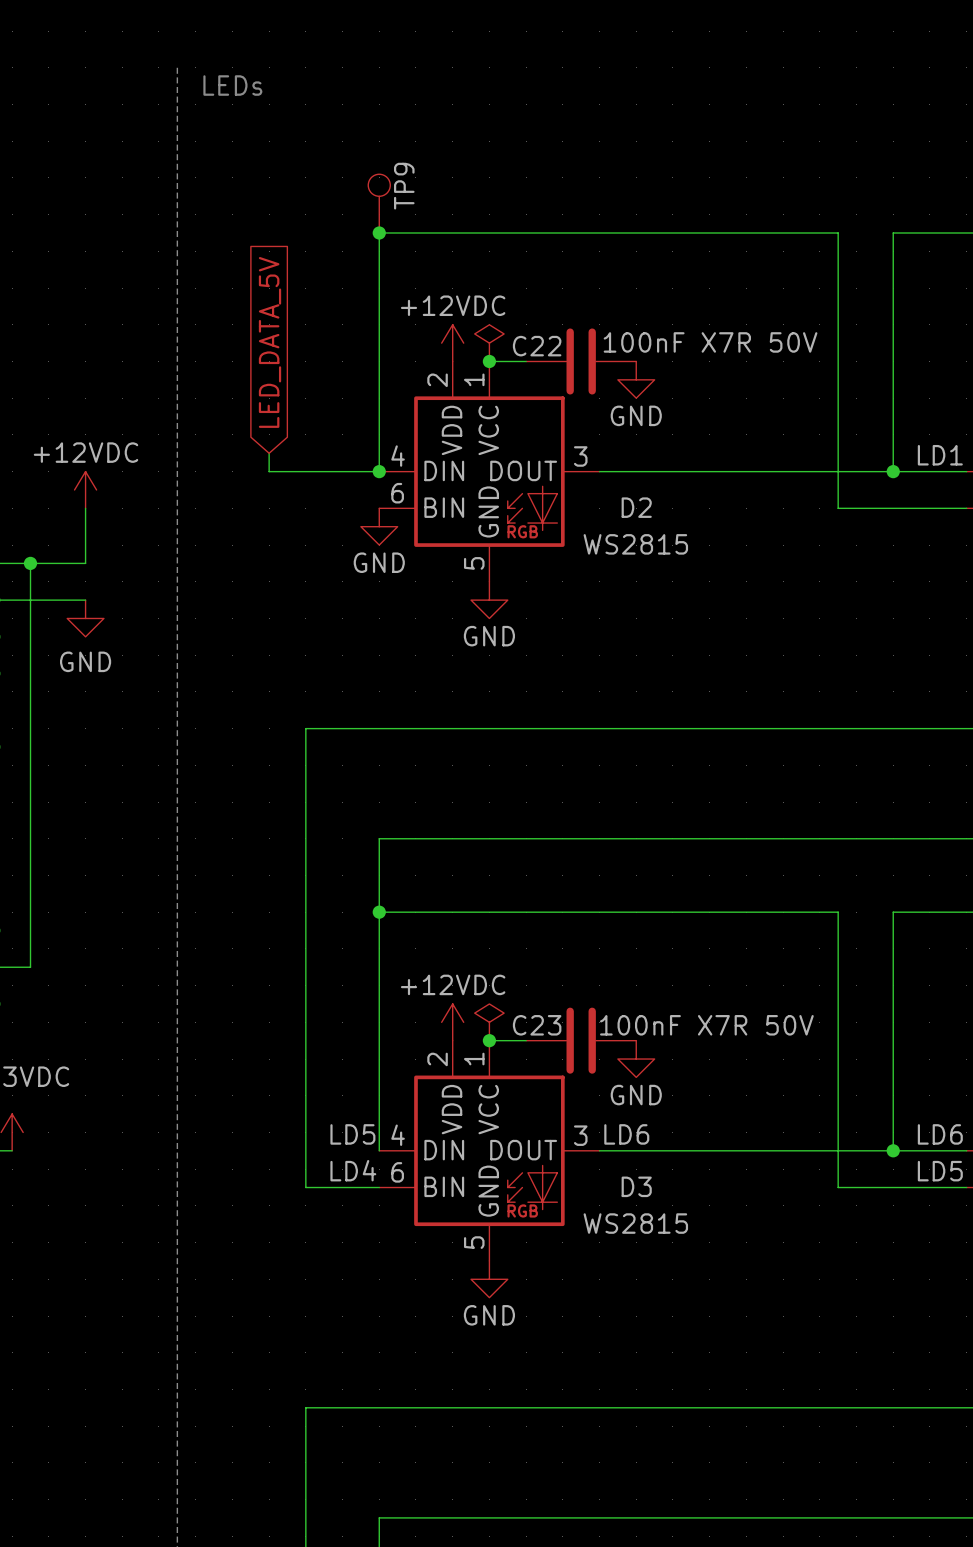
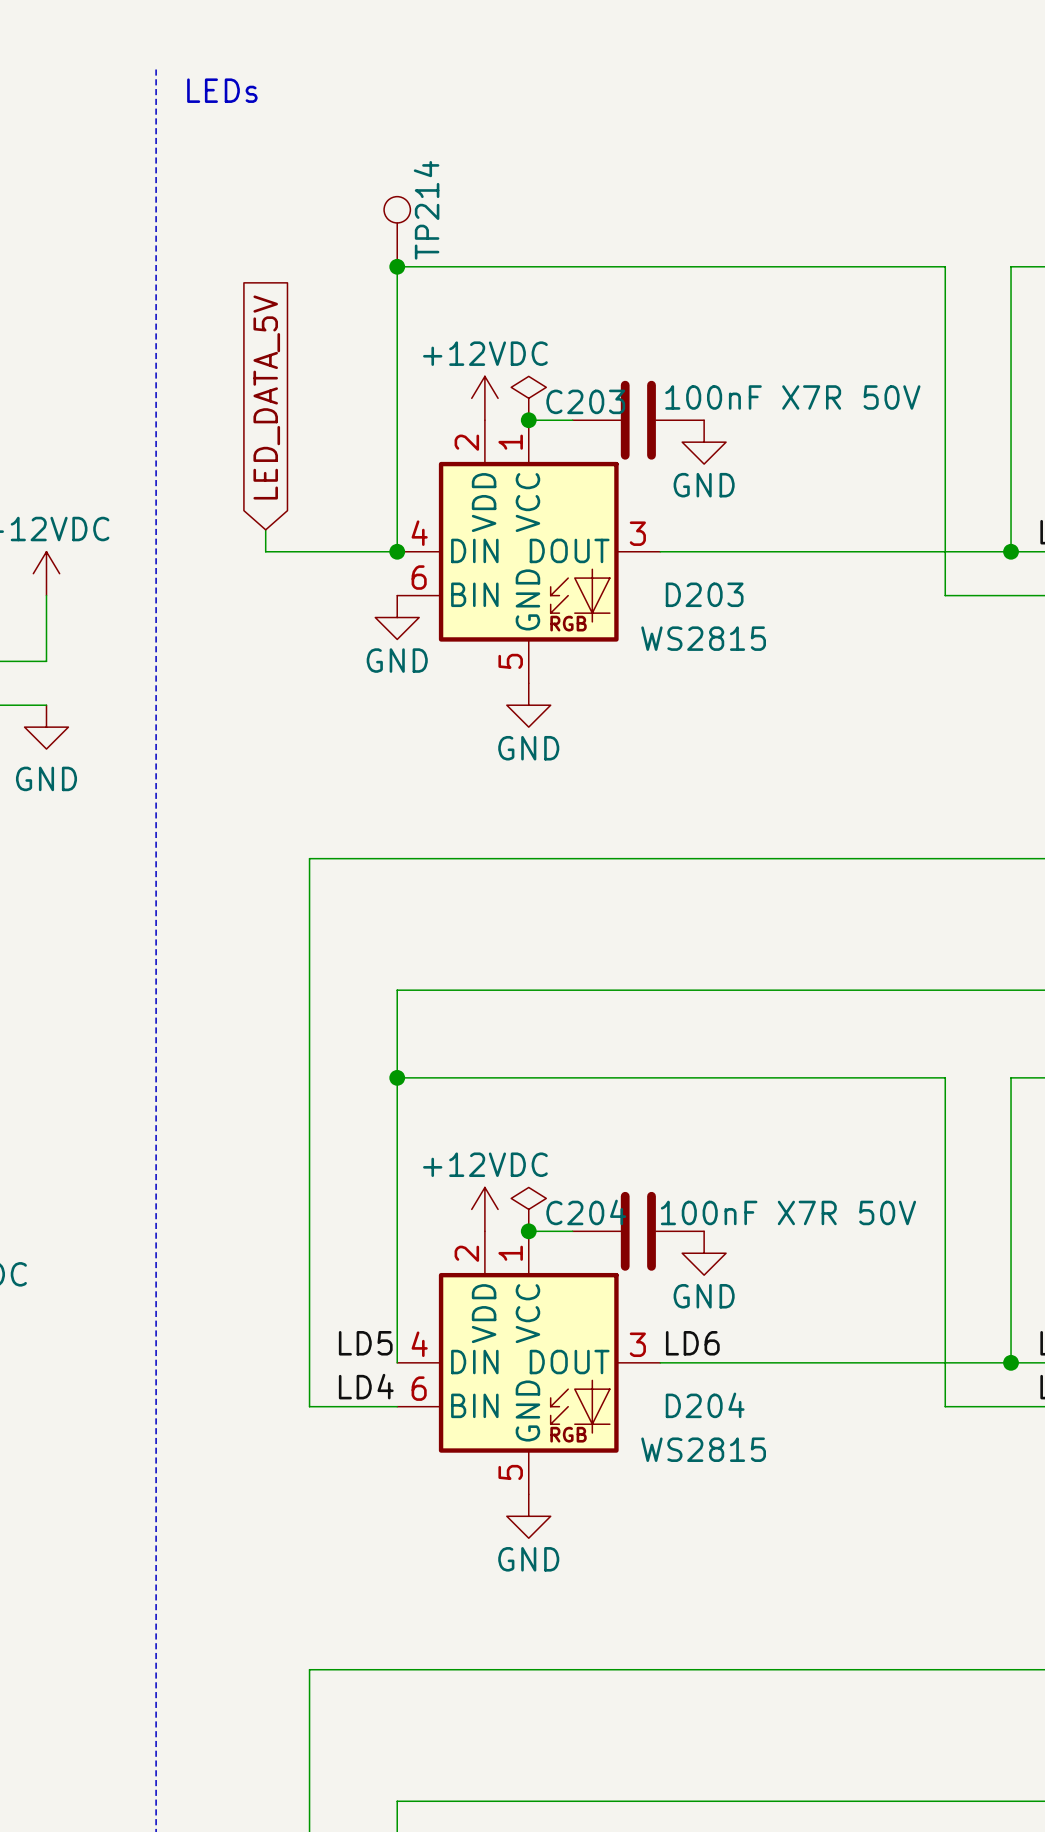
TP9 name: TP9 (404, 186) -> TP214 (426, 210)
C22 name: C22 (537, 346) -> C203 (585, 401)
D2 name: D2 (636, 507) -> D203 (704, 594)
C23 name: C23 (537, 1025) -> C204 (586, 1212)
D3 name: D3 (636, 1186) -> D204 (705, 1405)

